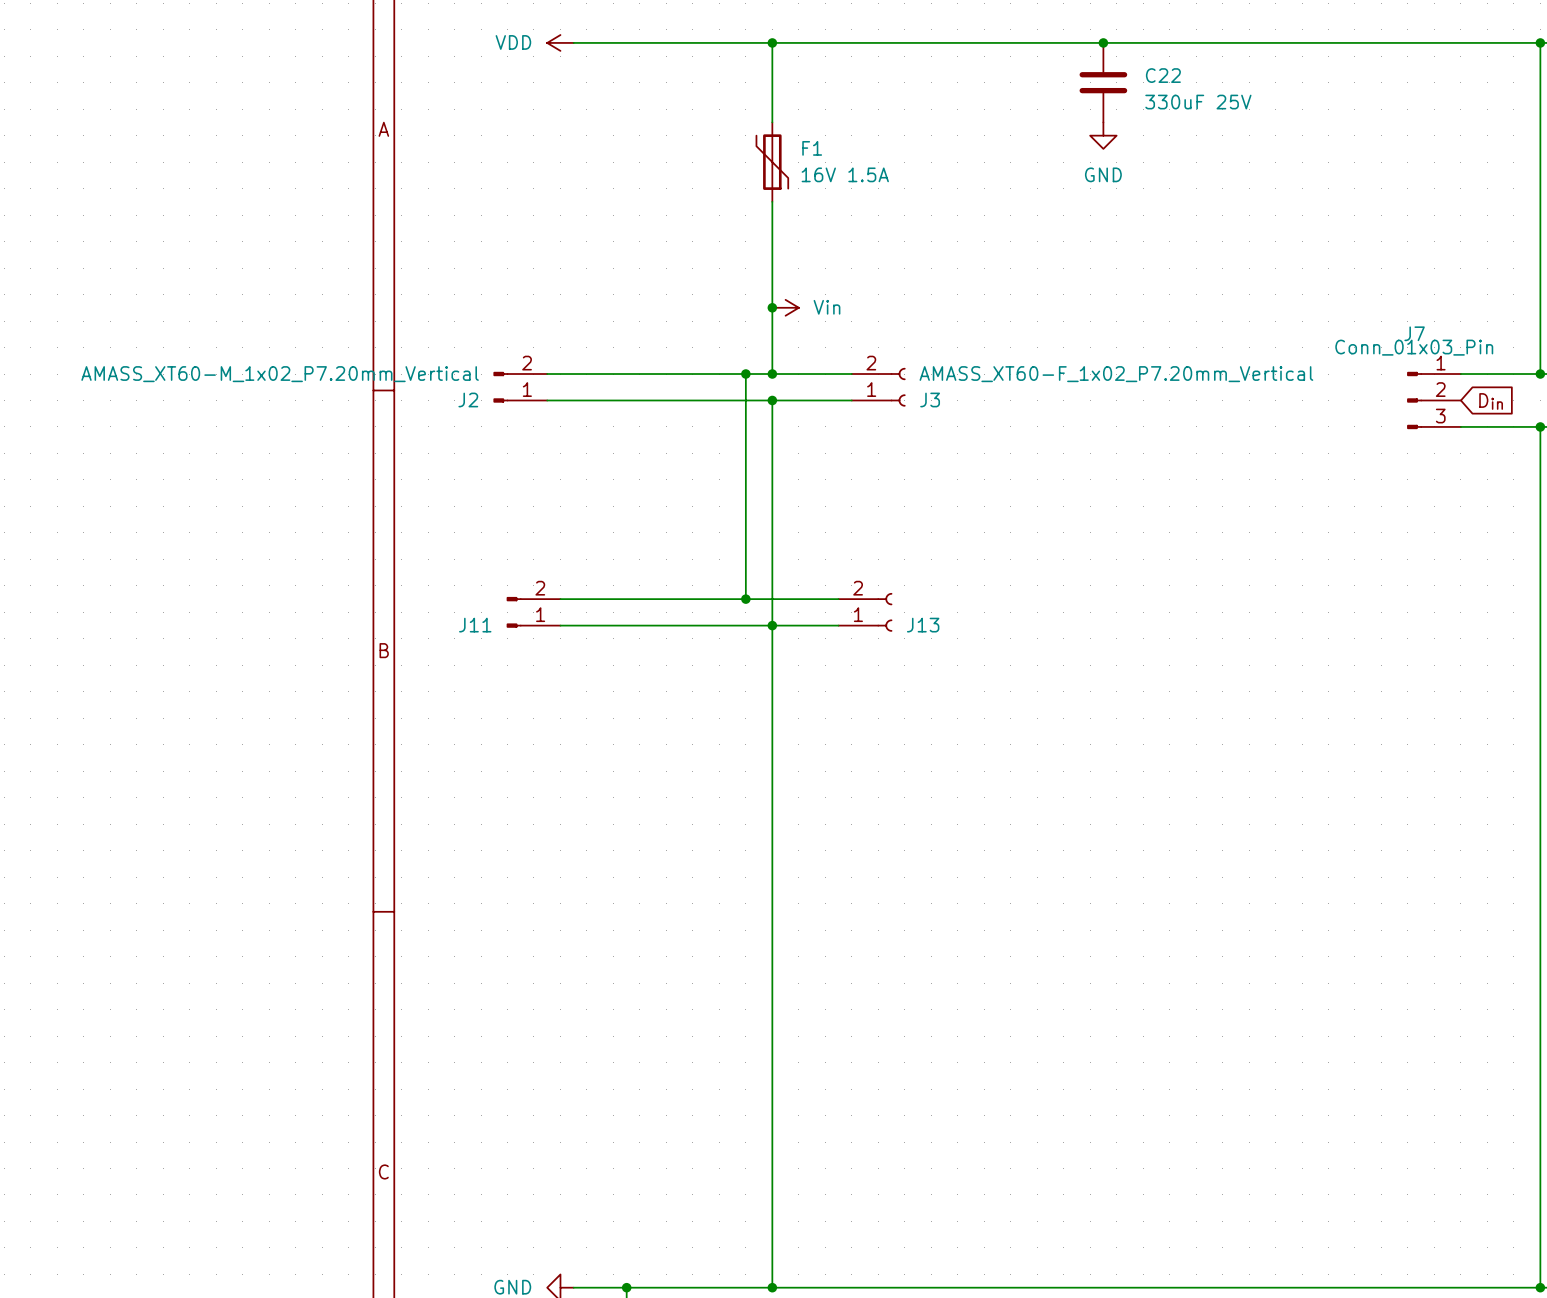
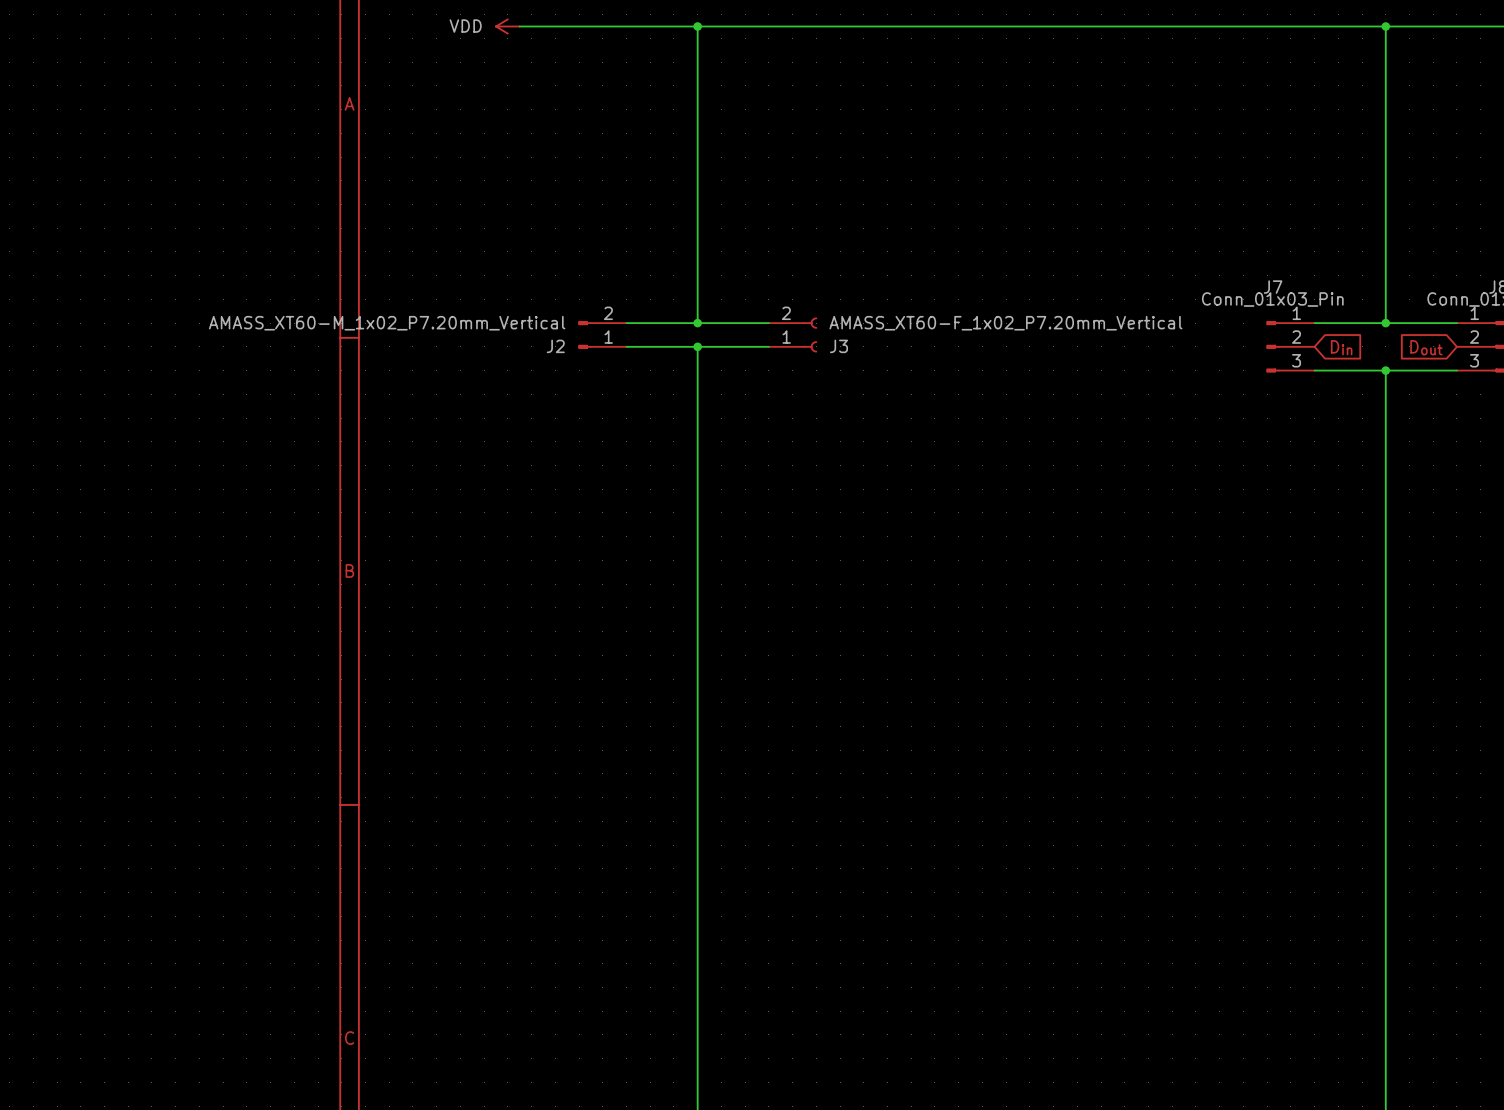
junction: (1103, 42) -> none
C22: 330uF 25V (1103, 82) -> none
power symbol: GND (1103, 135) -> none
F1: 16V 1.5A (772, 162) -> none
junction: (772, 307) -> none
power symbol: Vin (785, 307) -> none
wire: (547, 374) (692, 374) -> none
wire: (745, 374) (745, 599) -> none
junction: (745, 374) -> none
J2 position: (520, 387) -> (602, 334)
wire: (547, 400) (692, 400) -> none
wire: (560, 599) (838, 599) -> none
junction: (745, 599) -> none
J11: (533, 612) -> none
J13: (865, 612) -> none
wire: (560, 625) (838, 625) -> none
junction: (772, 625) -> none

